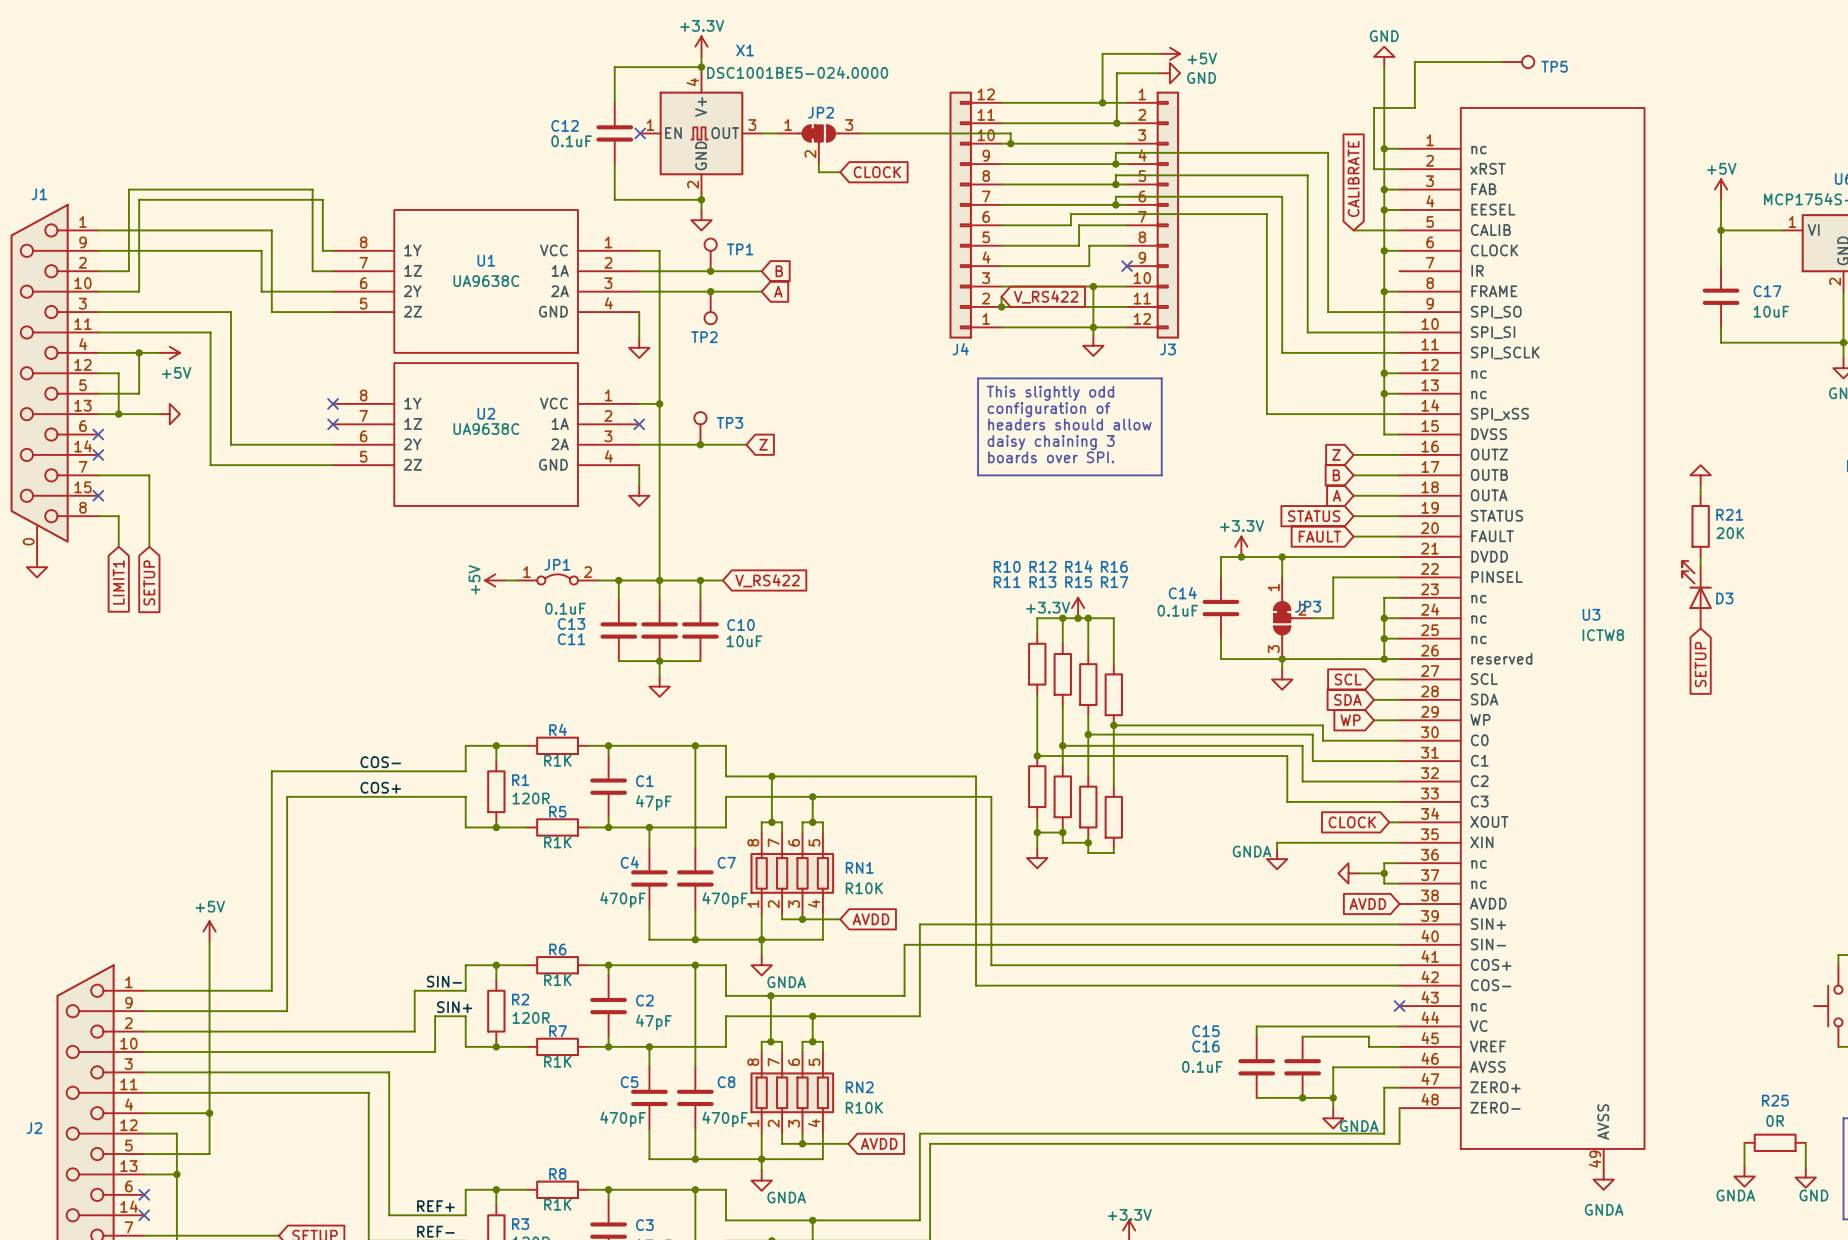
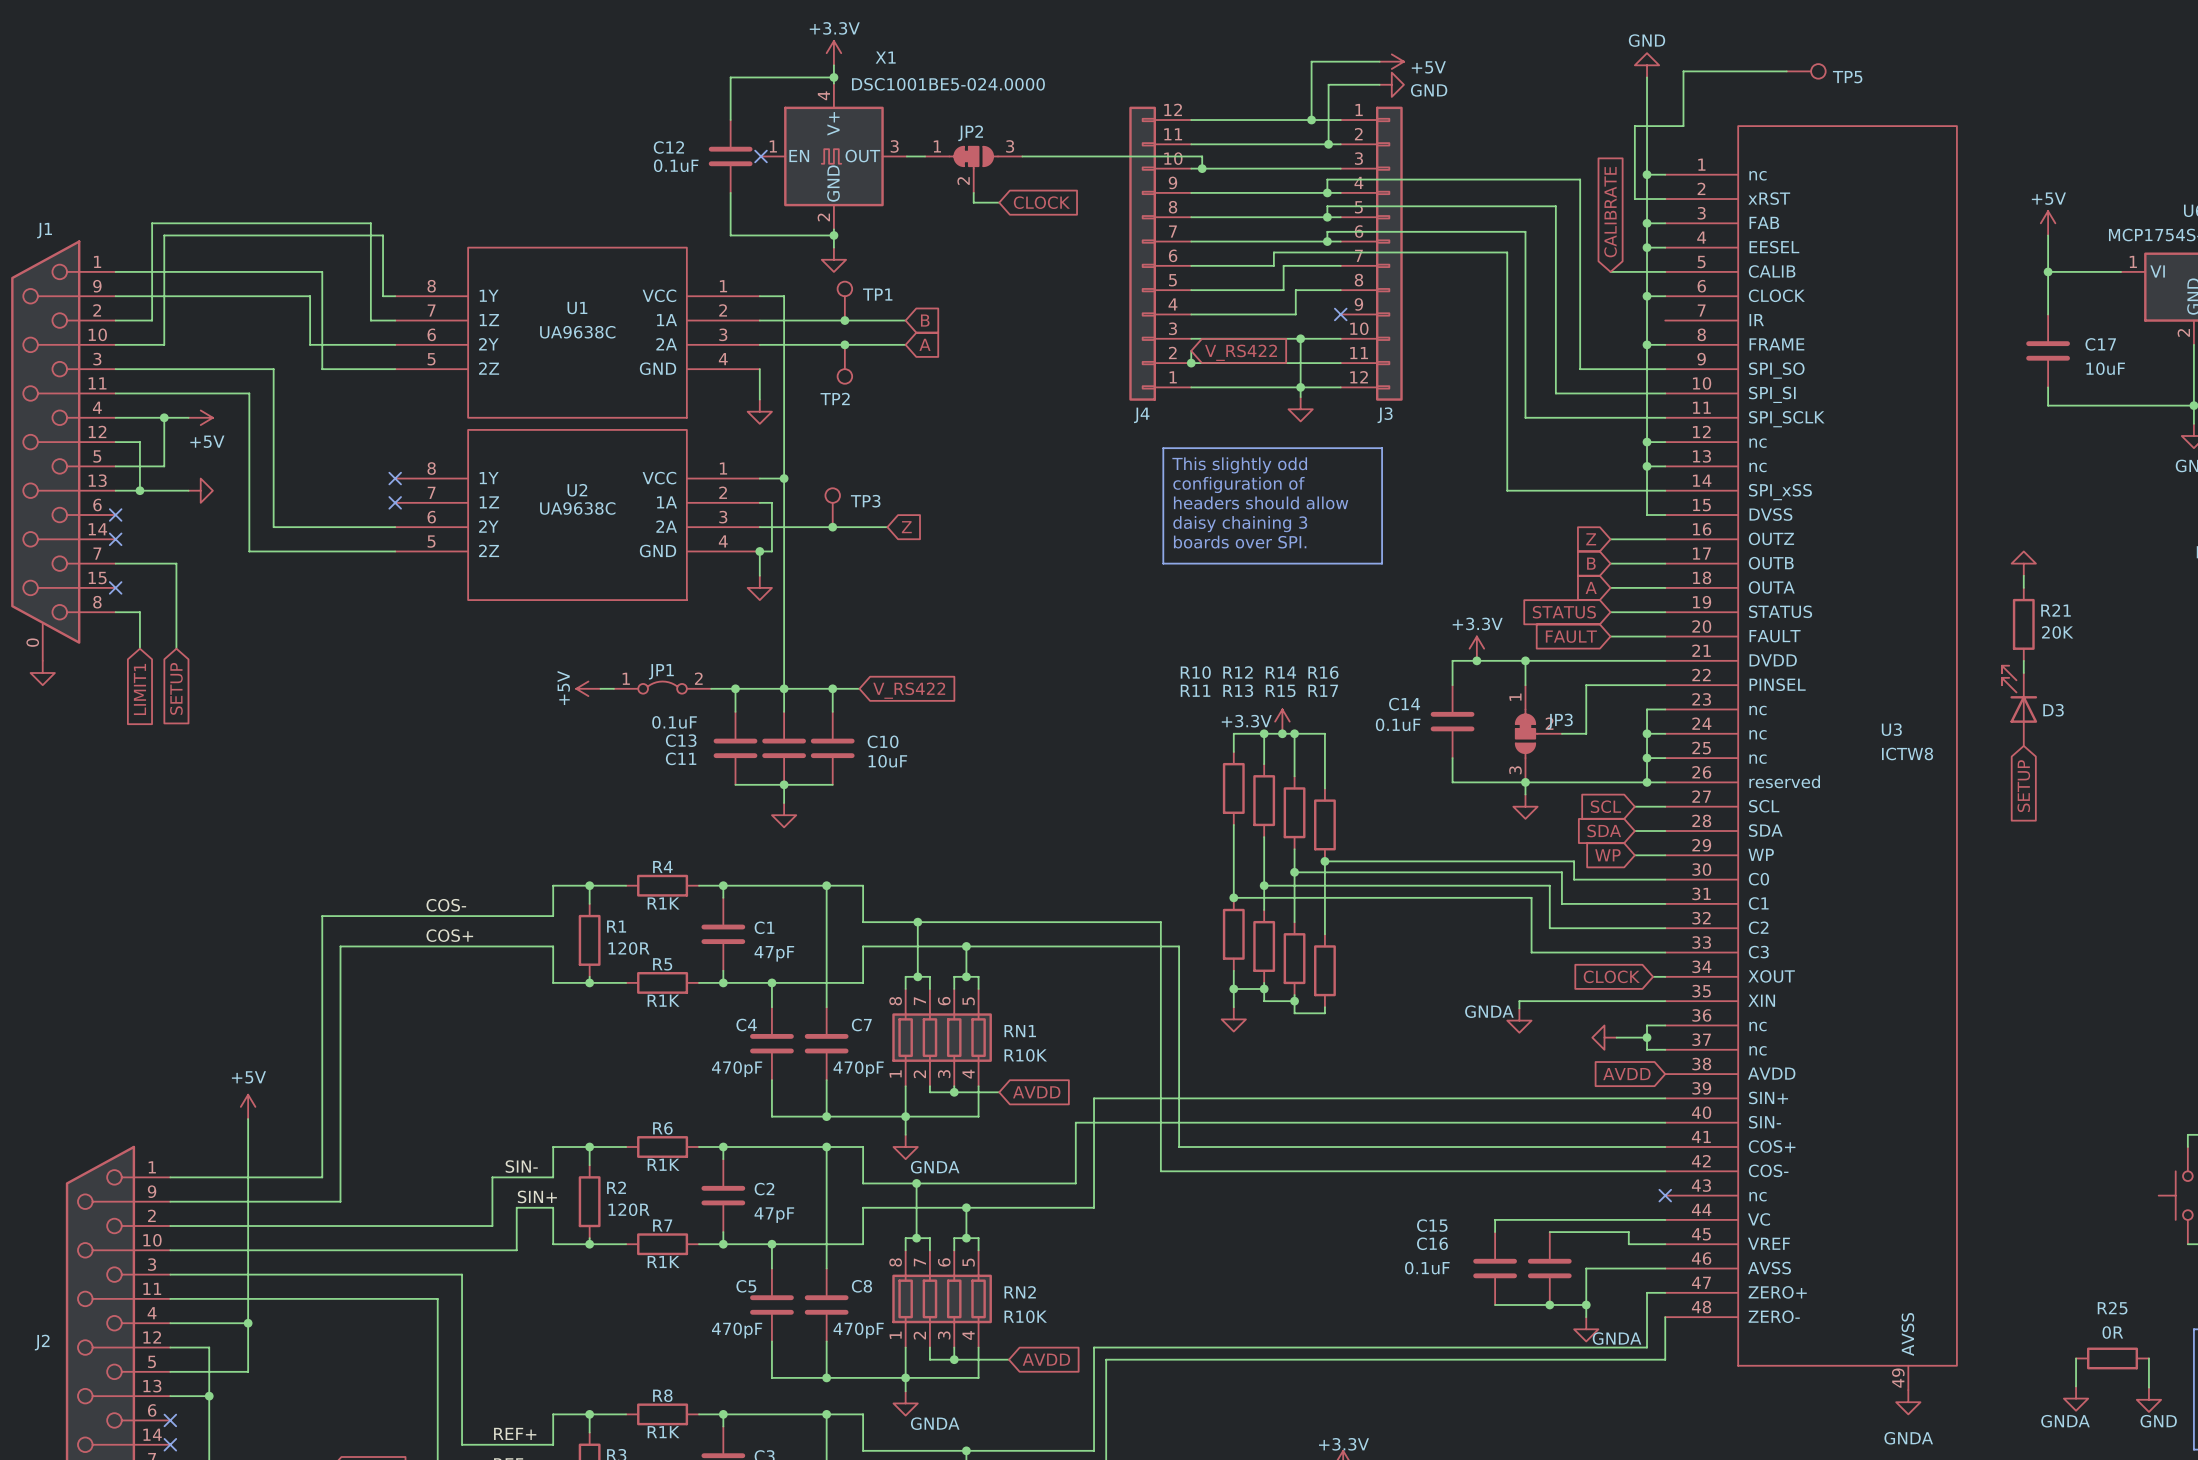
wire: none -> (759, 502) (771, 502) (771, 551) (759, 551)
no-connect mark: (639, 424) -> none
junction: none -> (759, 551)

